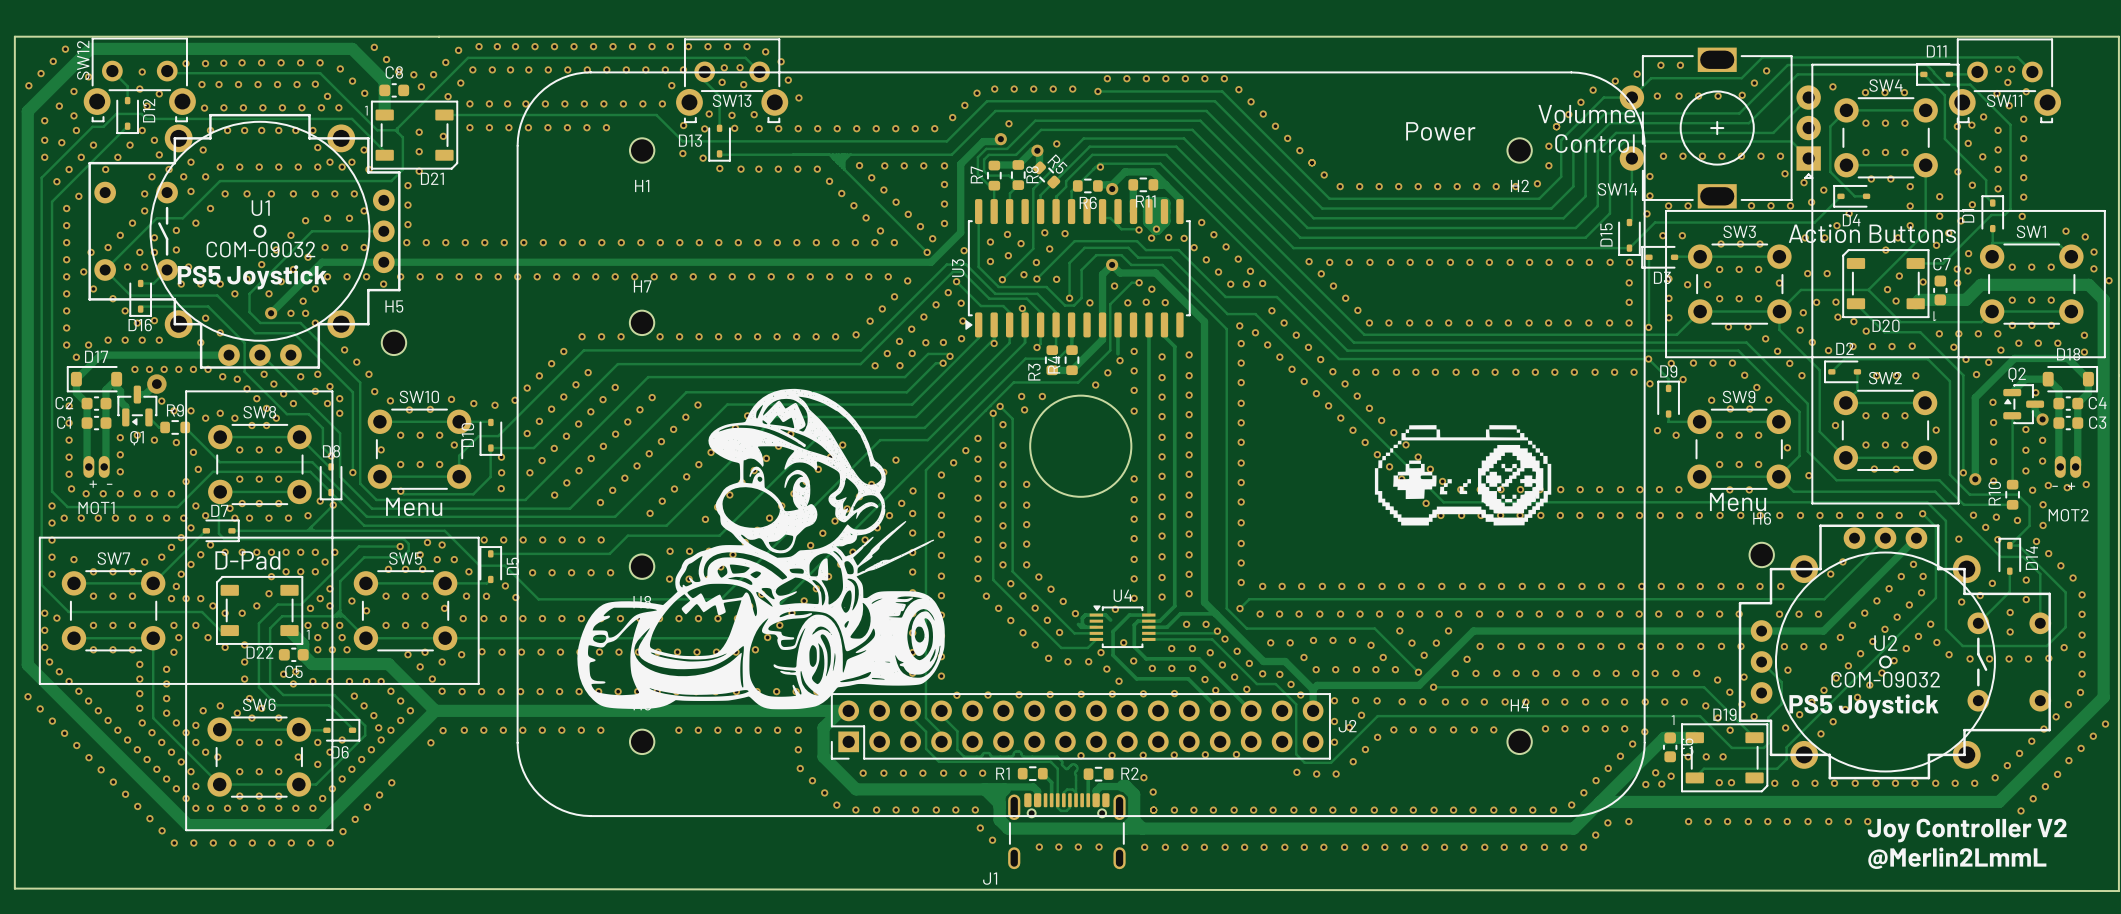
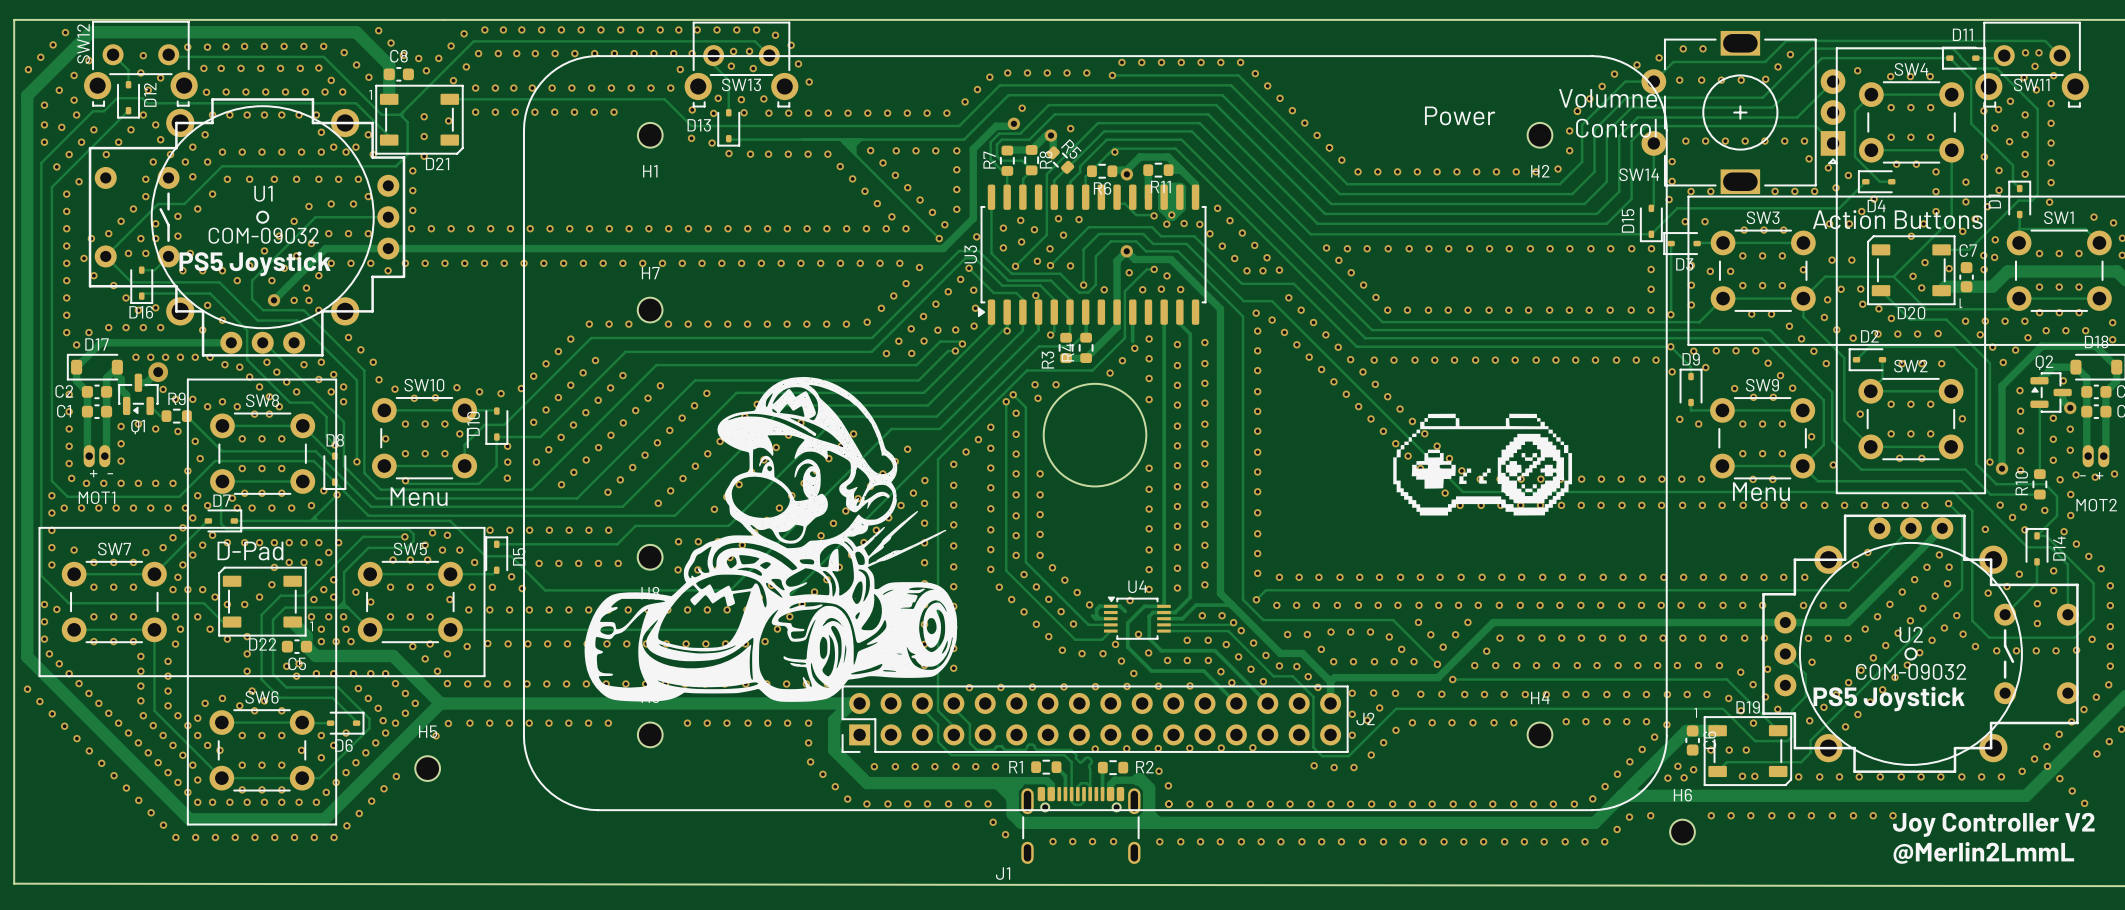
H5 position: (393, 342) -> (427, 768)
H6 position: (1761, 554) -> (1682, 832)
via: none -> (2047, 766)
via: (2057, 774) -> none
via: none -> (2059, 778)
via: (2045, 786) -> none
via: none -> (2072, 791)
via: (2033, 798) -> none
via: none -> (2084, 803)
via: (2021, 810) -> none

